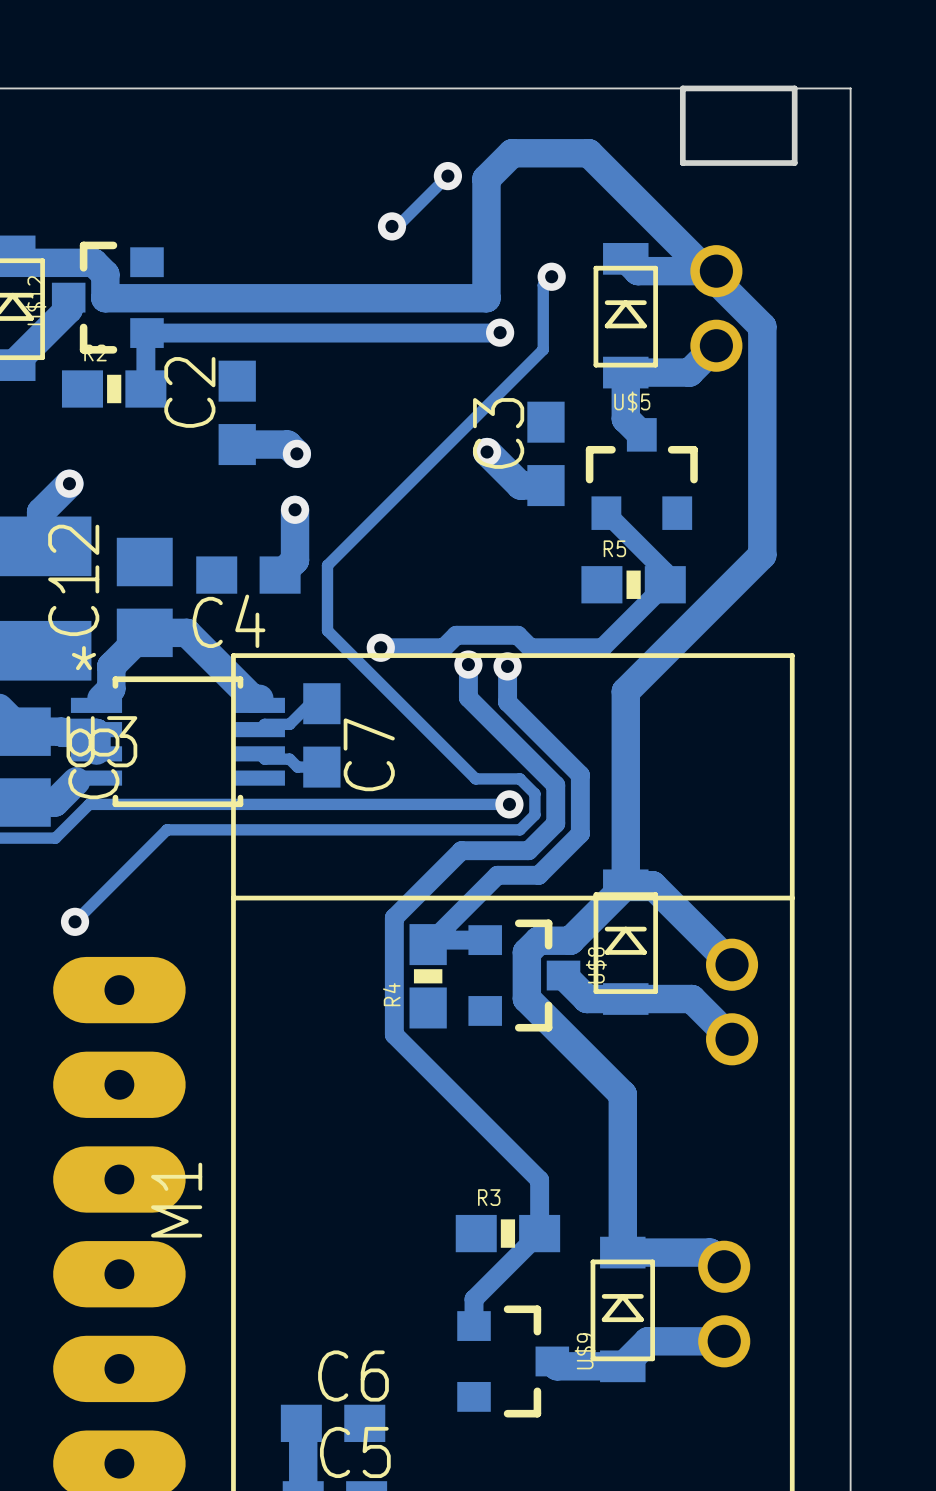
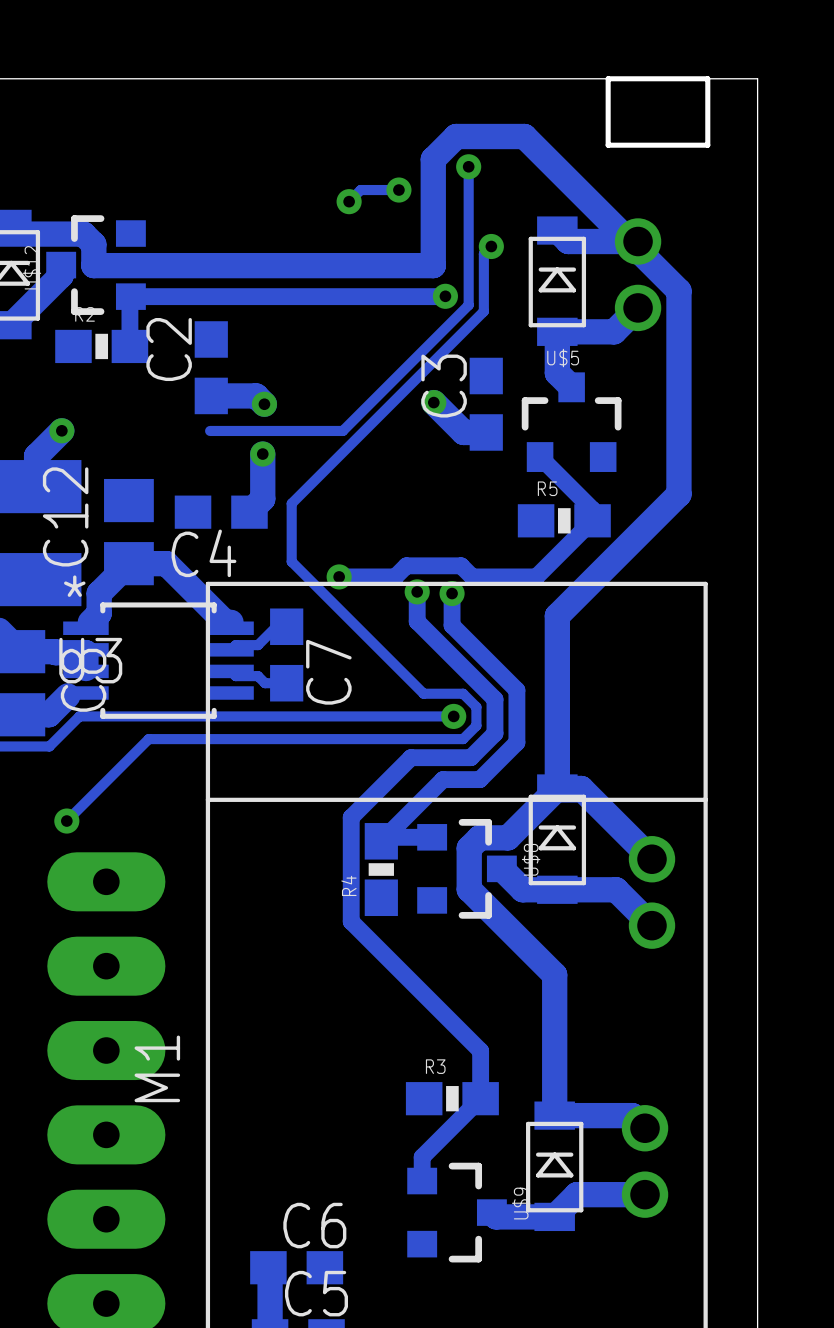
track: (447, 176) (397, 226) (391, 226) -> (398, 190) (360, 190) (349, 201)
via position: (447, 176) -> (398, 190)
track: none -> (468, 166) (468, 305) (342, 430) (210, 430)
via: none -> (468, 166)

